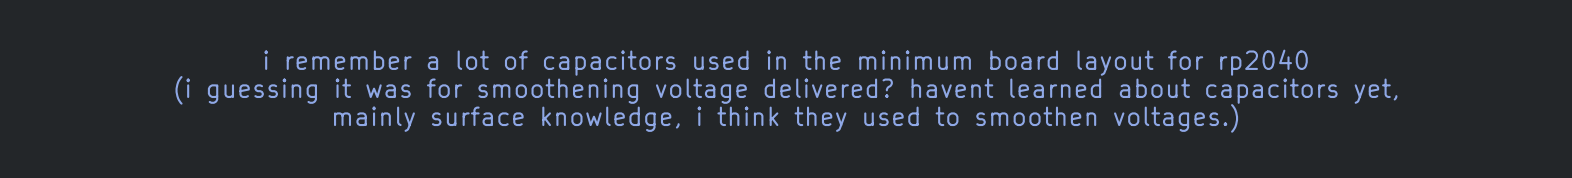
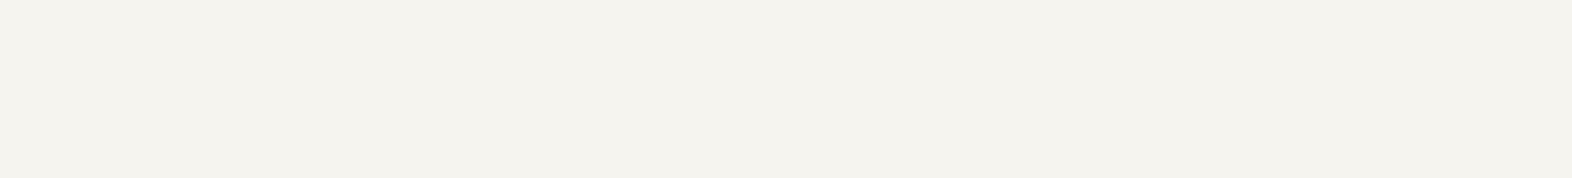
text: i remember a lot of capacitors used in the minimum board layout for rp2040 (786, 62) -> none
text: (i guessing it was for smoothening voltage delivered? havent learned about capacitors yet, (786, 90) -> none
text: mainly surface knowledge, i think they used to smoothen voltages.) (786, 118) -> none

